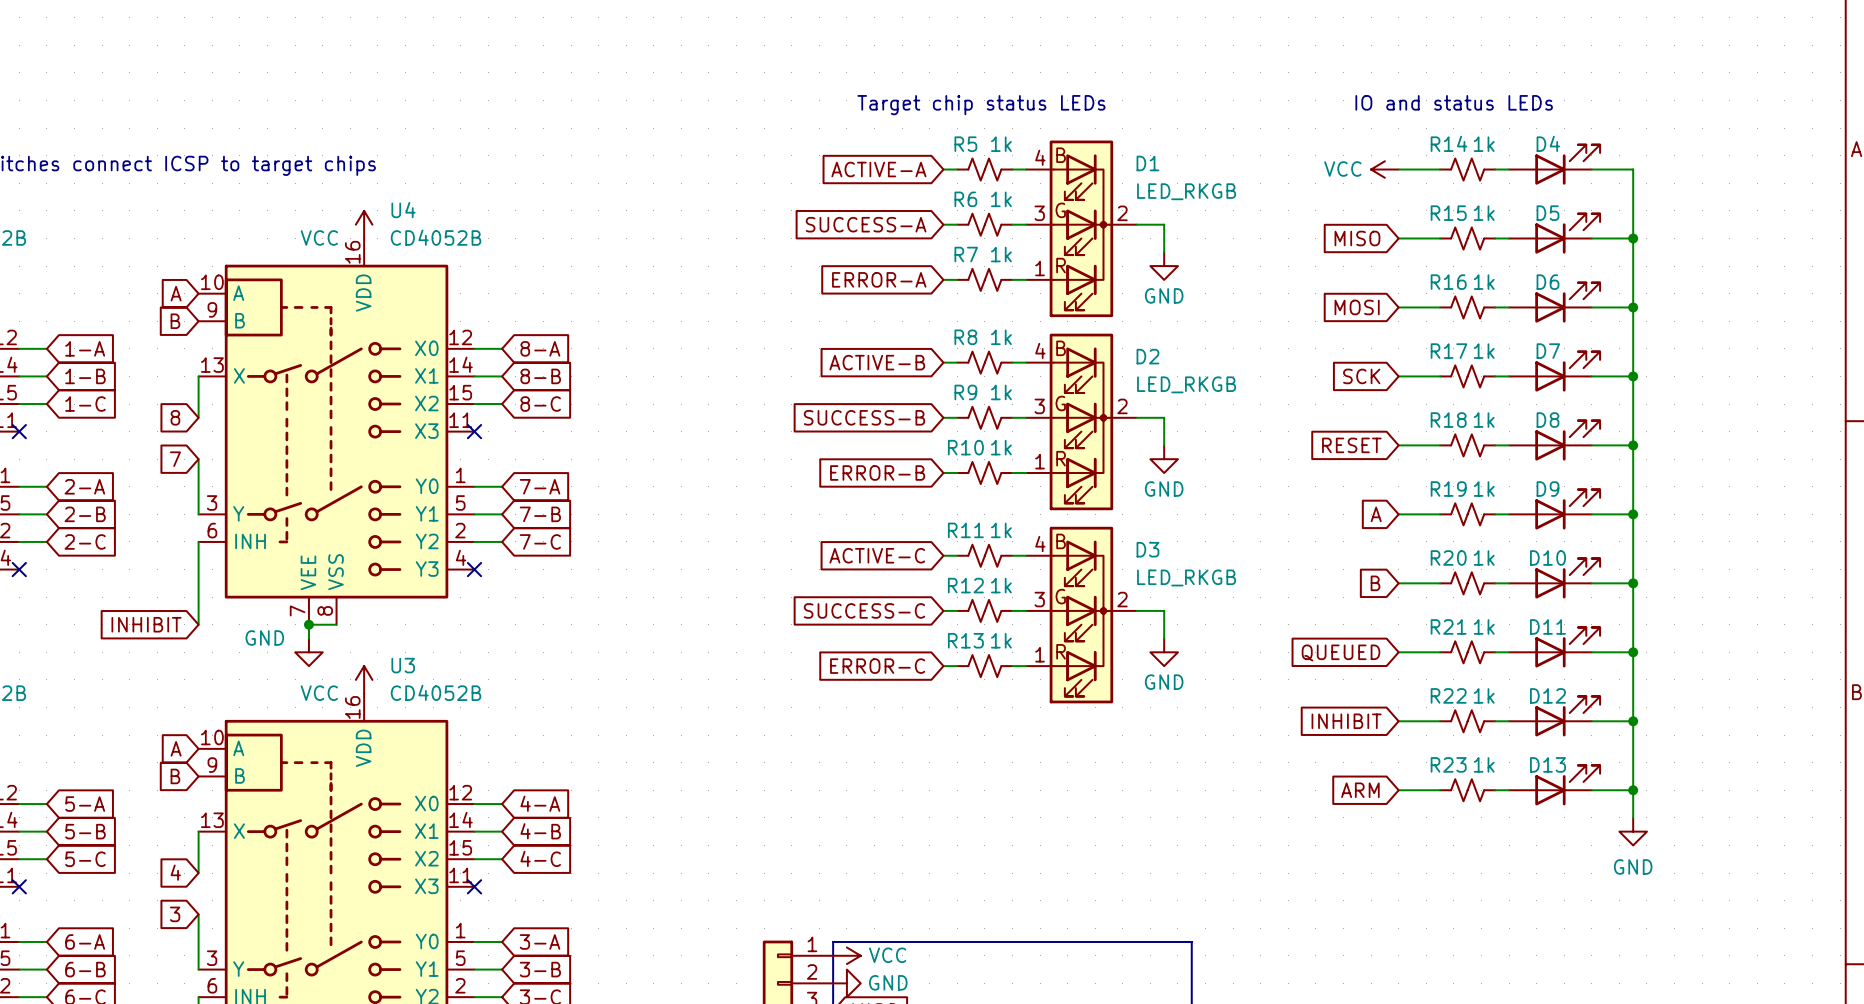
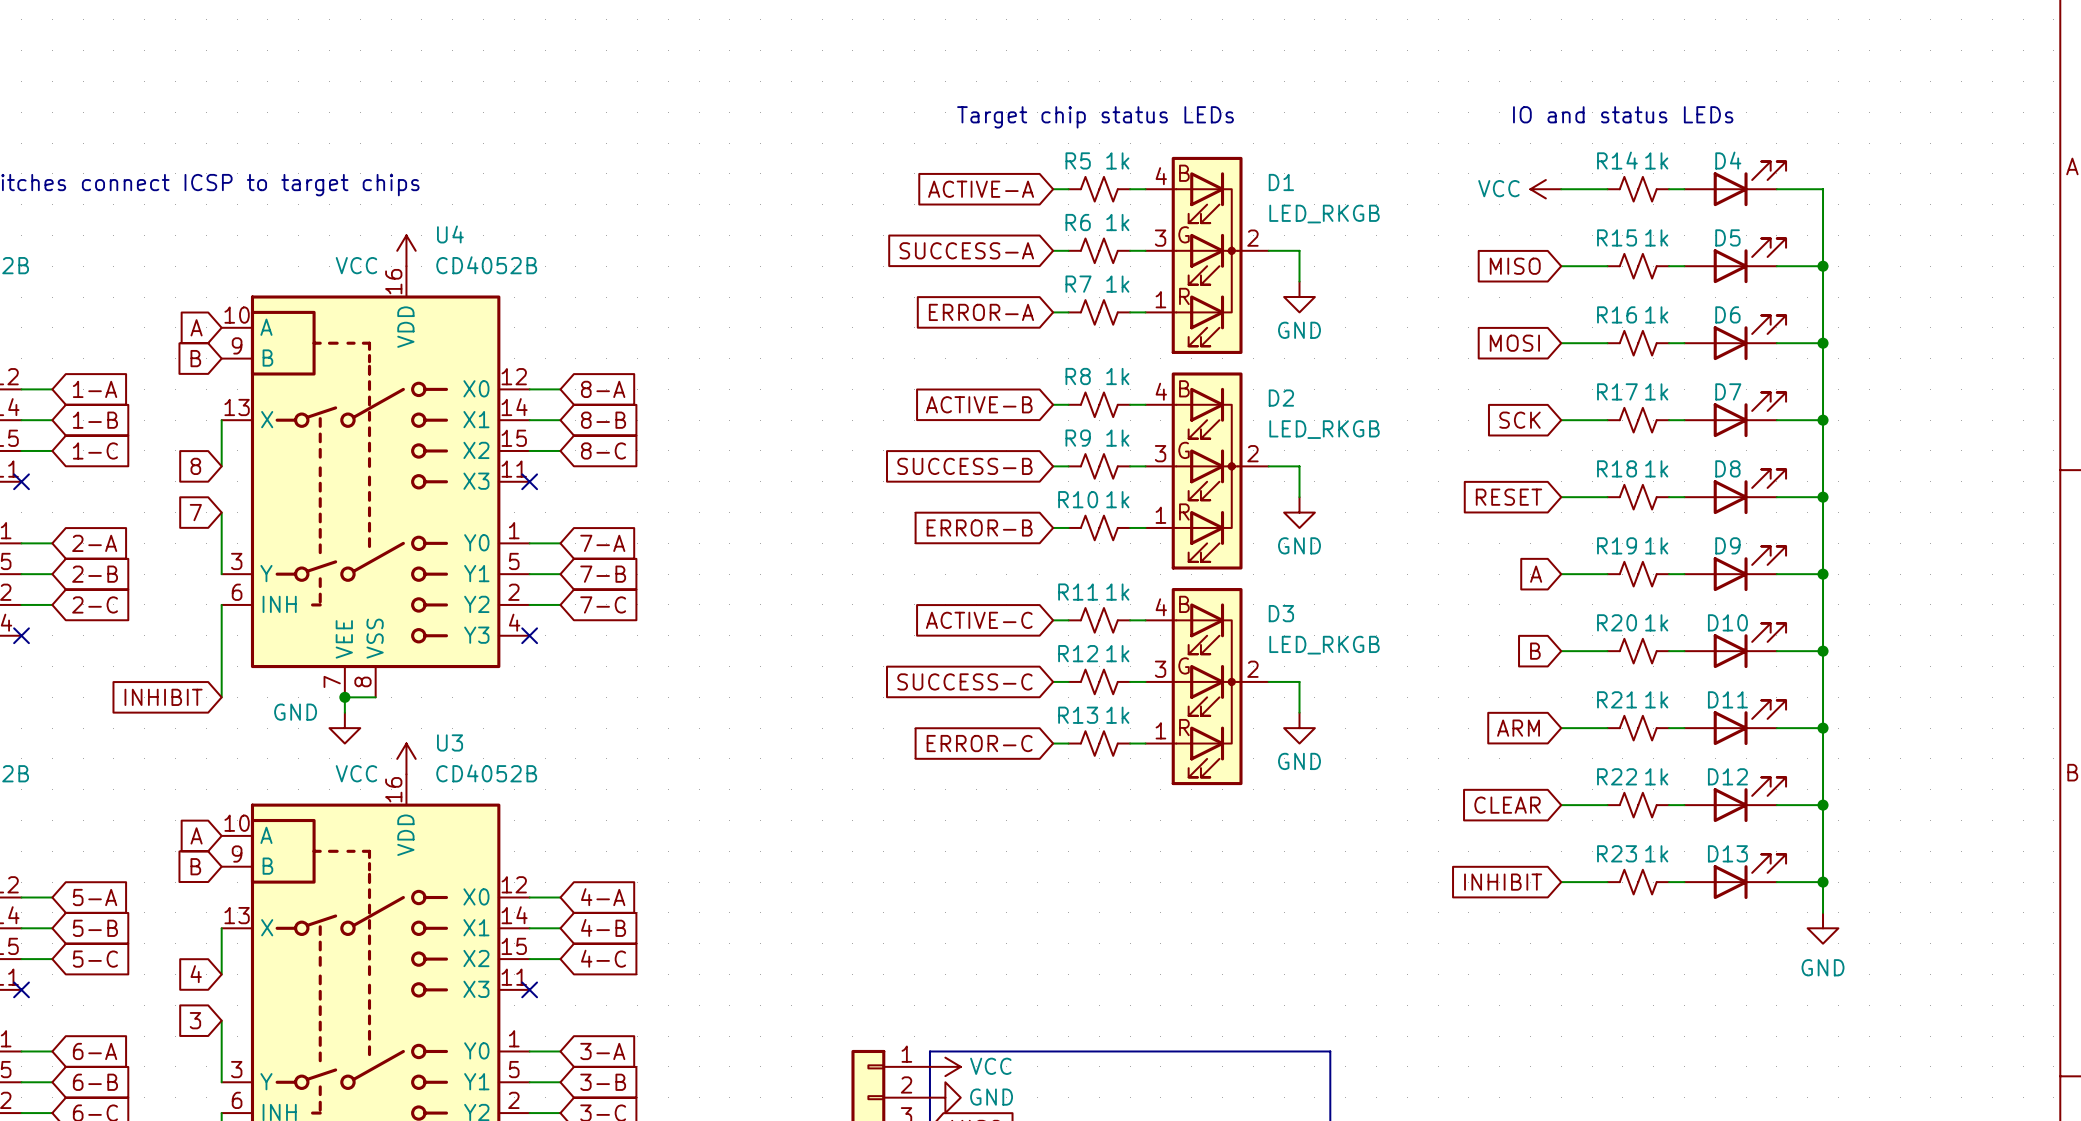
global label: QUEUED (1341, 652) -> ARM (1518, 728)
global label: INHIBIT (1346, 721) -> CLEAR (1507, 805)
global label: ARM (1360, 790) -> INHIBIT (1503, 882)

